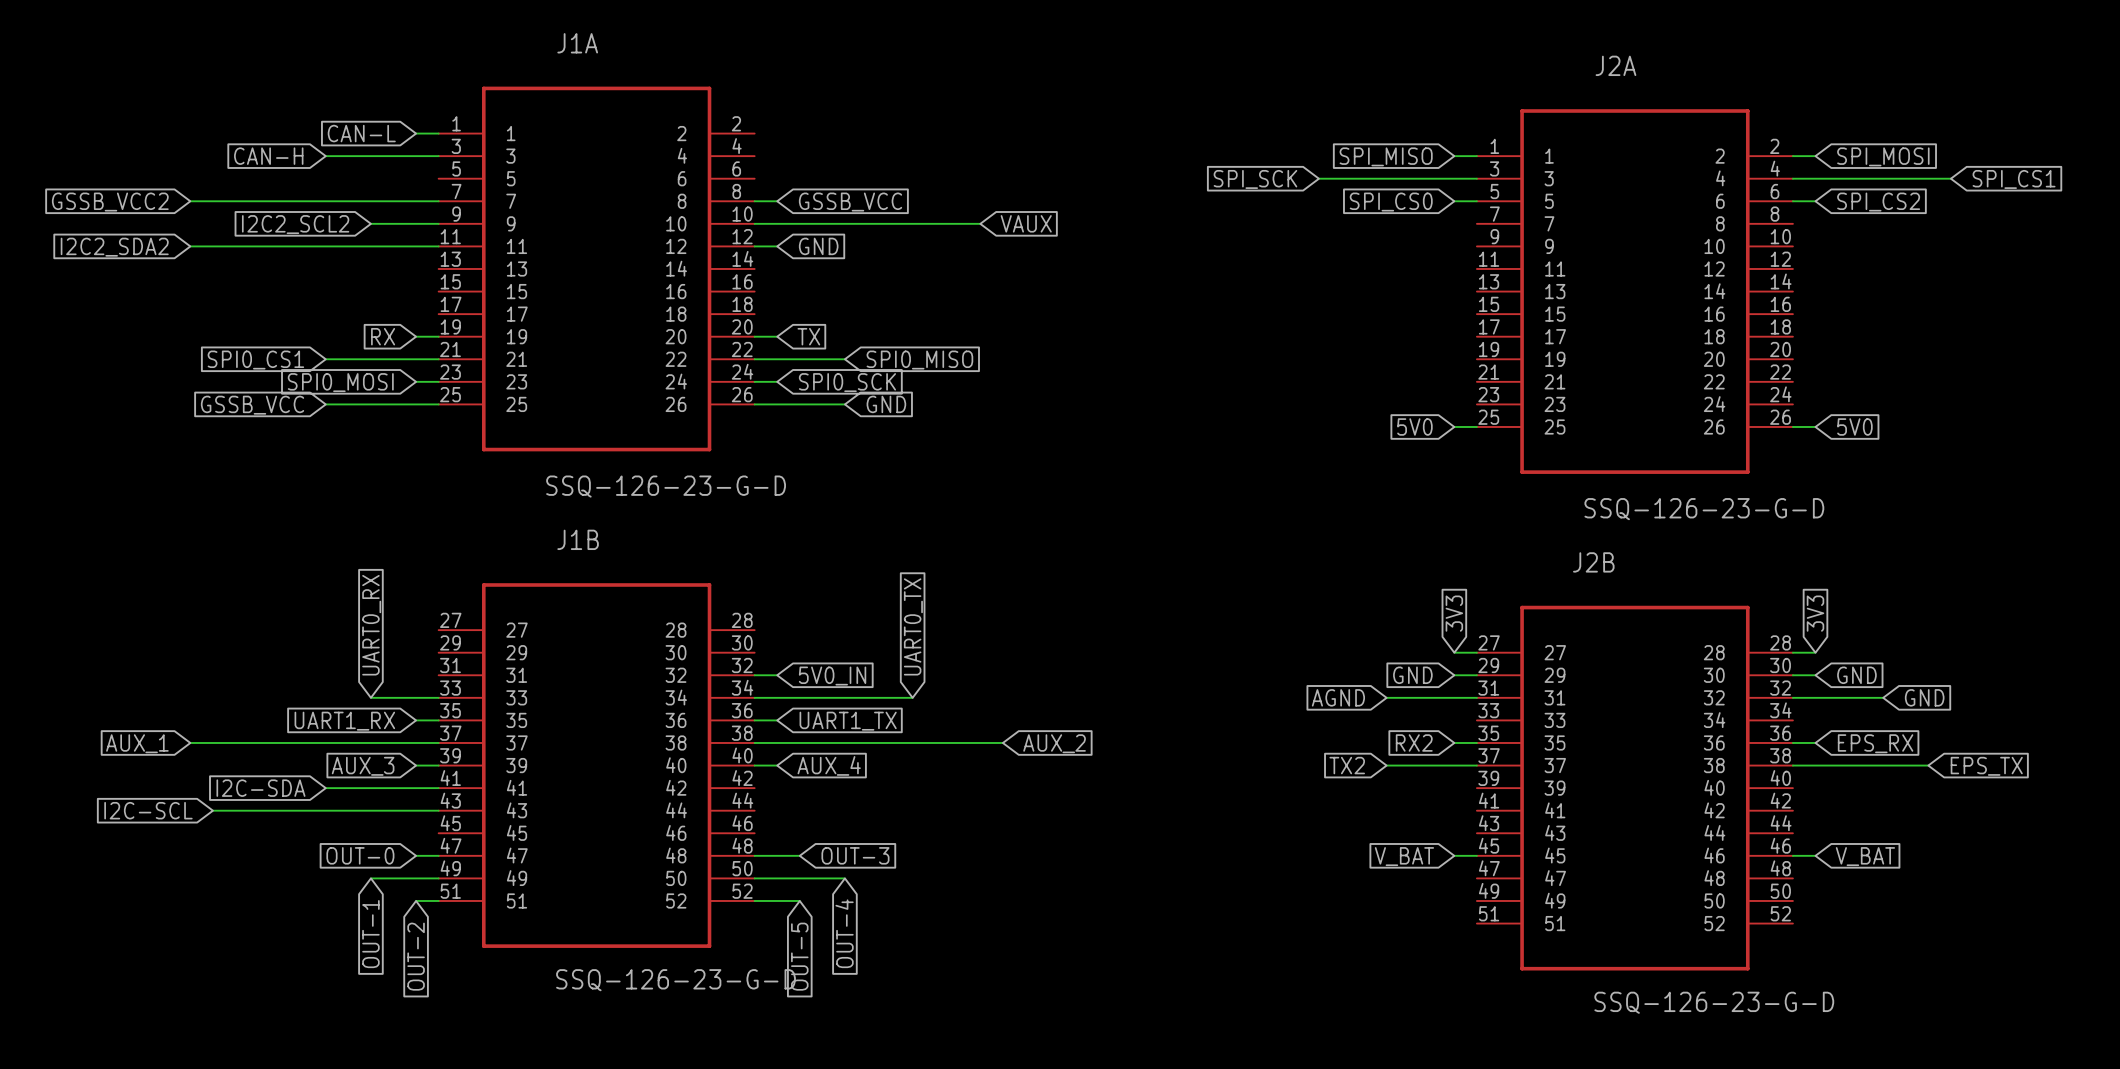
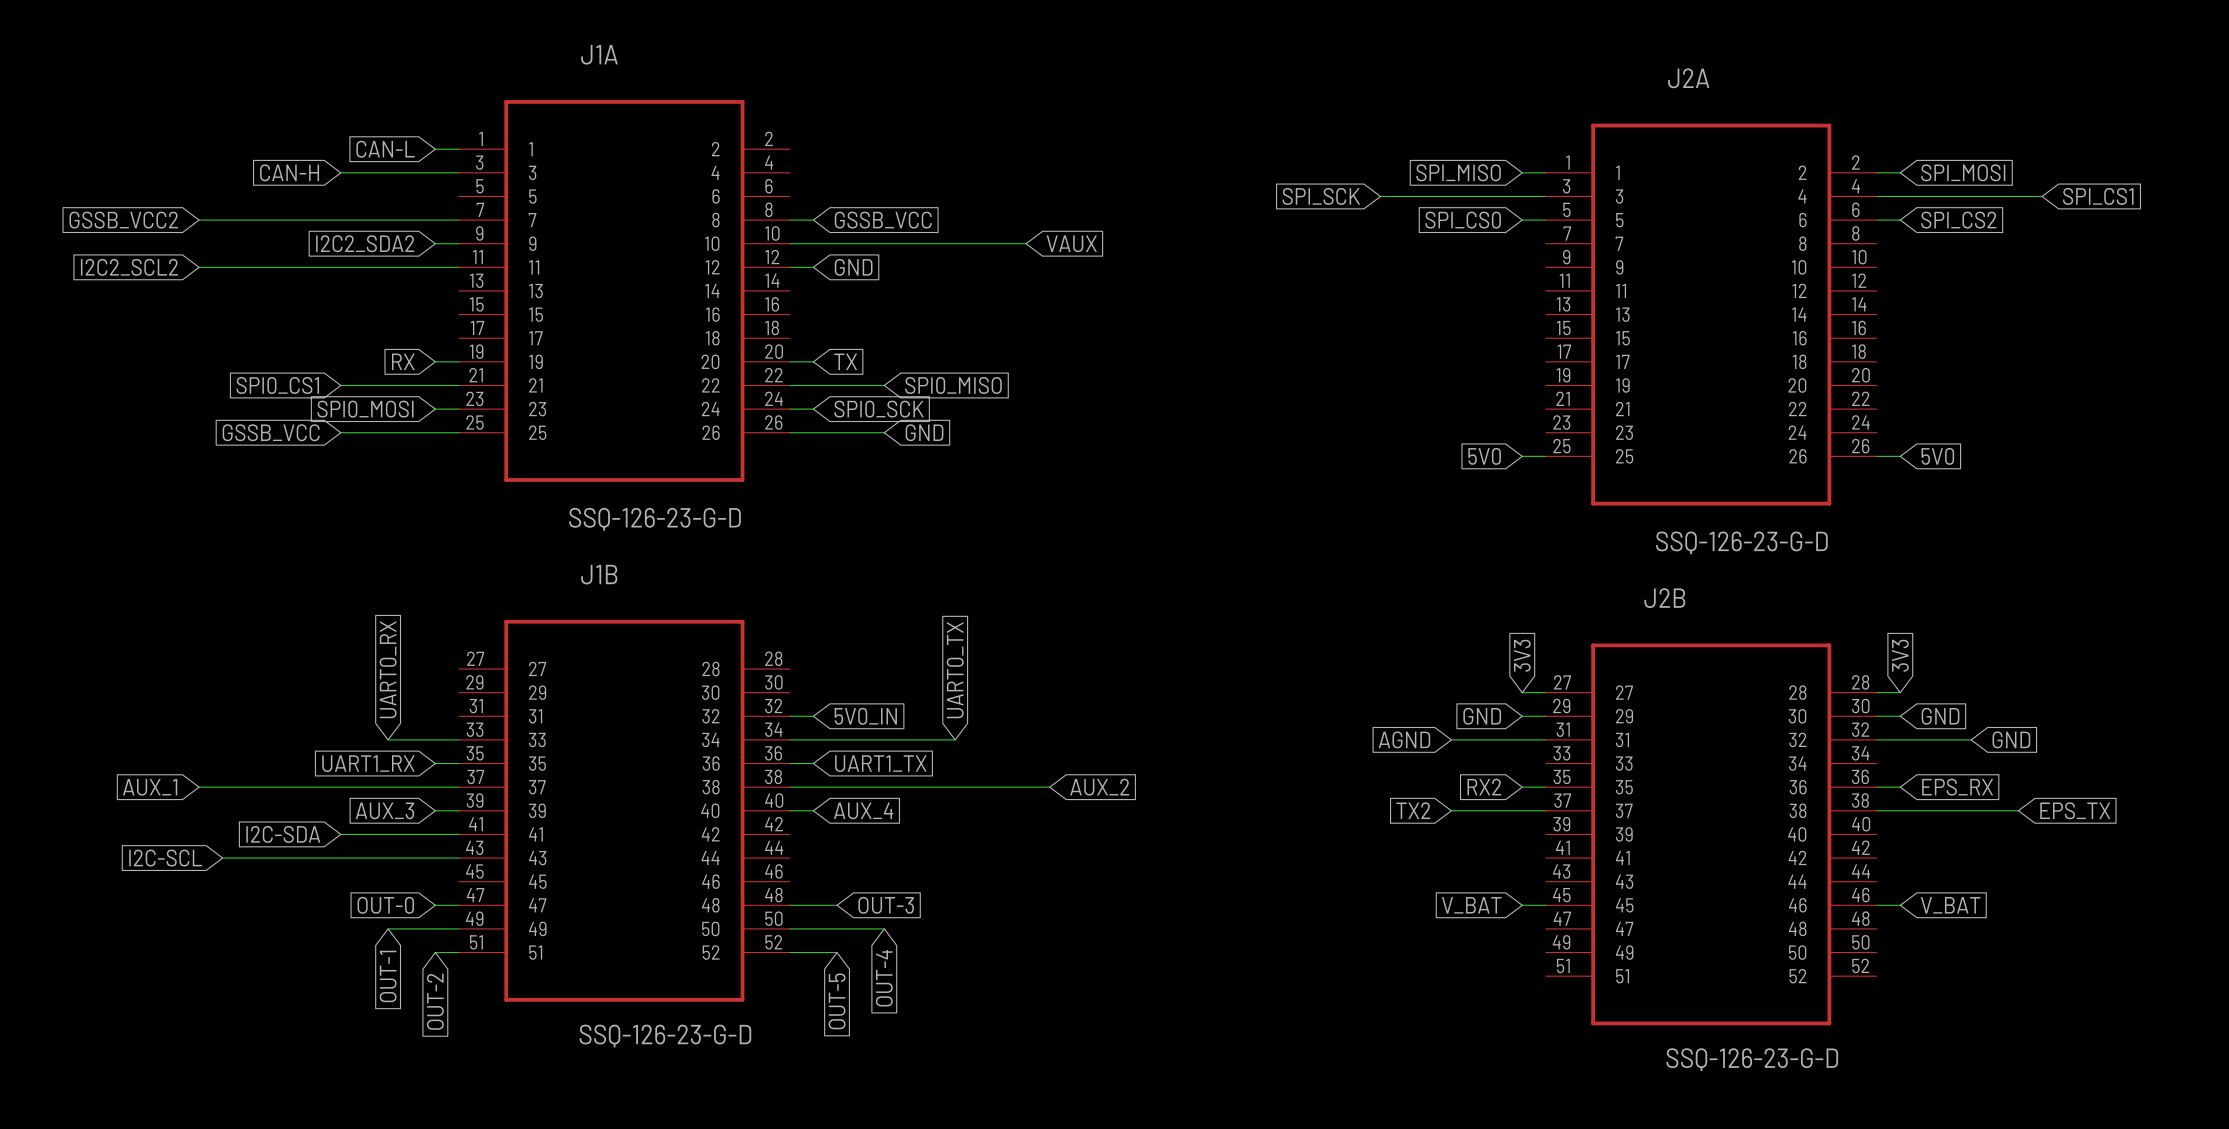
wire: (370, 223) (416, 223) -> none
global label: I2C2_SCL2 (295, 224) -> I2C2_SDA2 (365, 243)
global label: I2C2_SDA2 (114, 247) -> I2C2_SCL2 (129, 267)

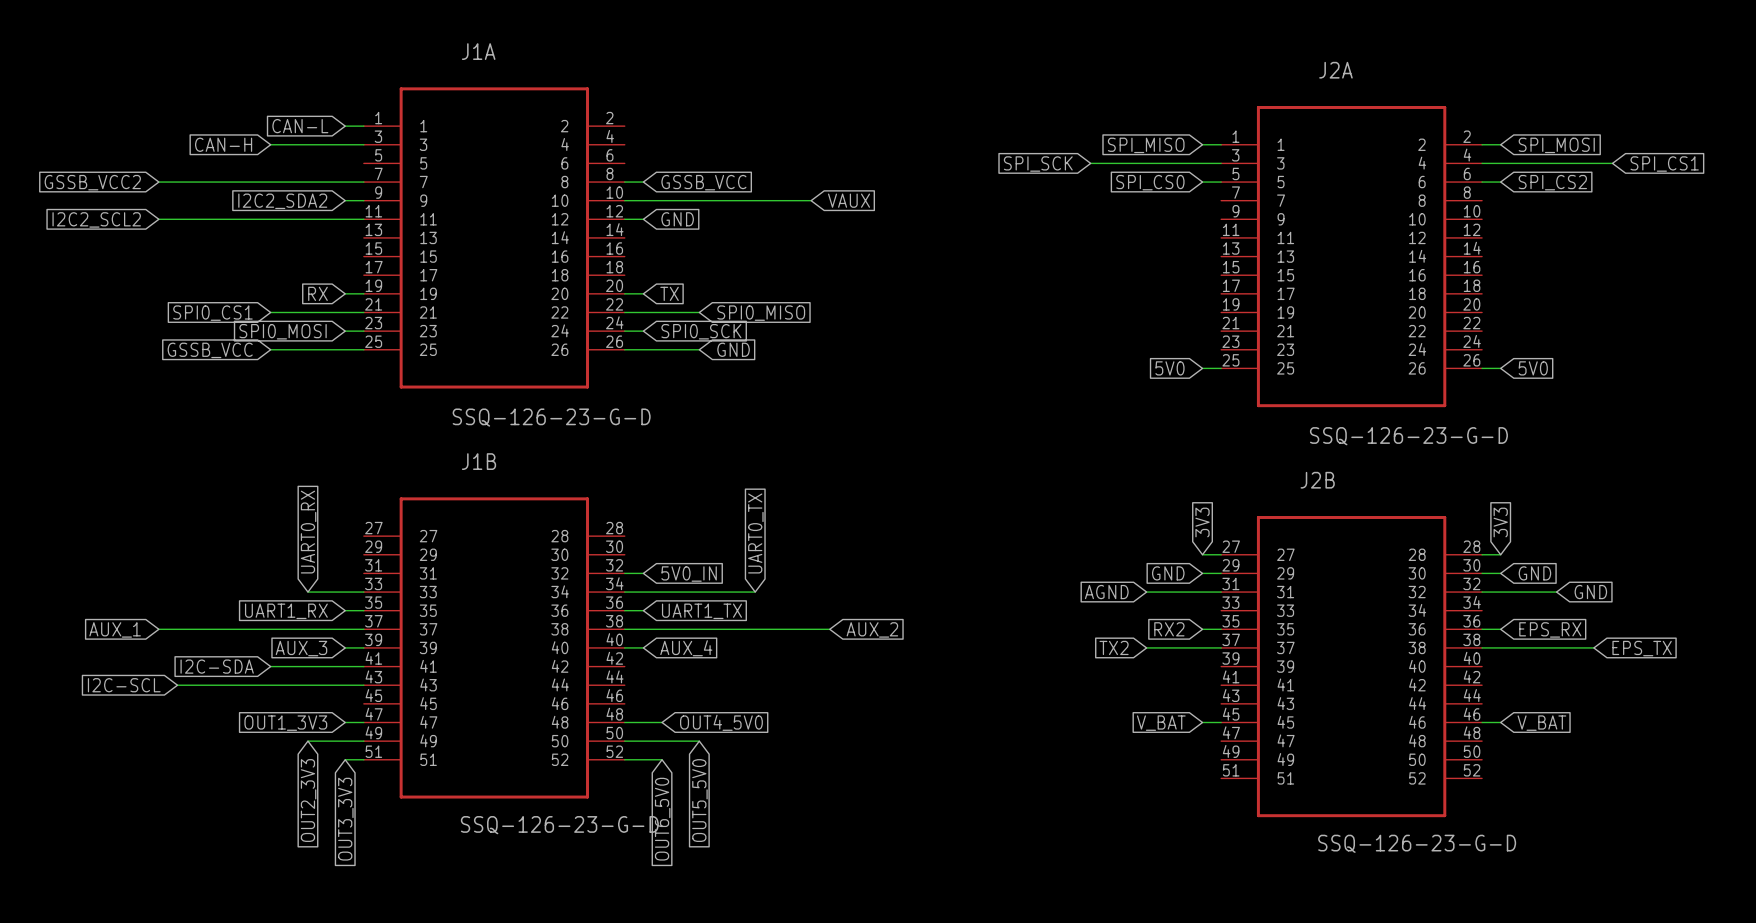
global label: OUT-0 (385, 905) -> OUT1_3V3 (285, 723)
global label: OUT-3 (886, 905) -> OUT4_5V0 (721, 722)
global label: OUT-1 (388, 976) -> OUT2_3V3 (308, 800)
global label: OUT-4 (884, 978) -> OUT5_5V0 (699, 800)
global label: OUT-2 (435, 1001) -> OUT3_3V3 (345, 819)
global label: OUT-5 (837, 1001) -> OUT6_5V0 (662, 819)

